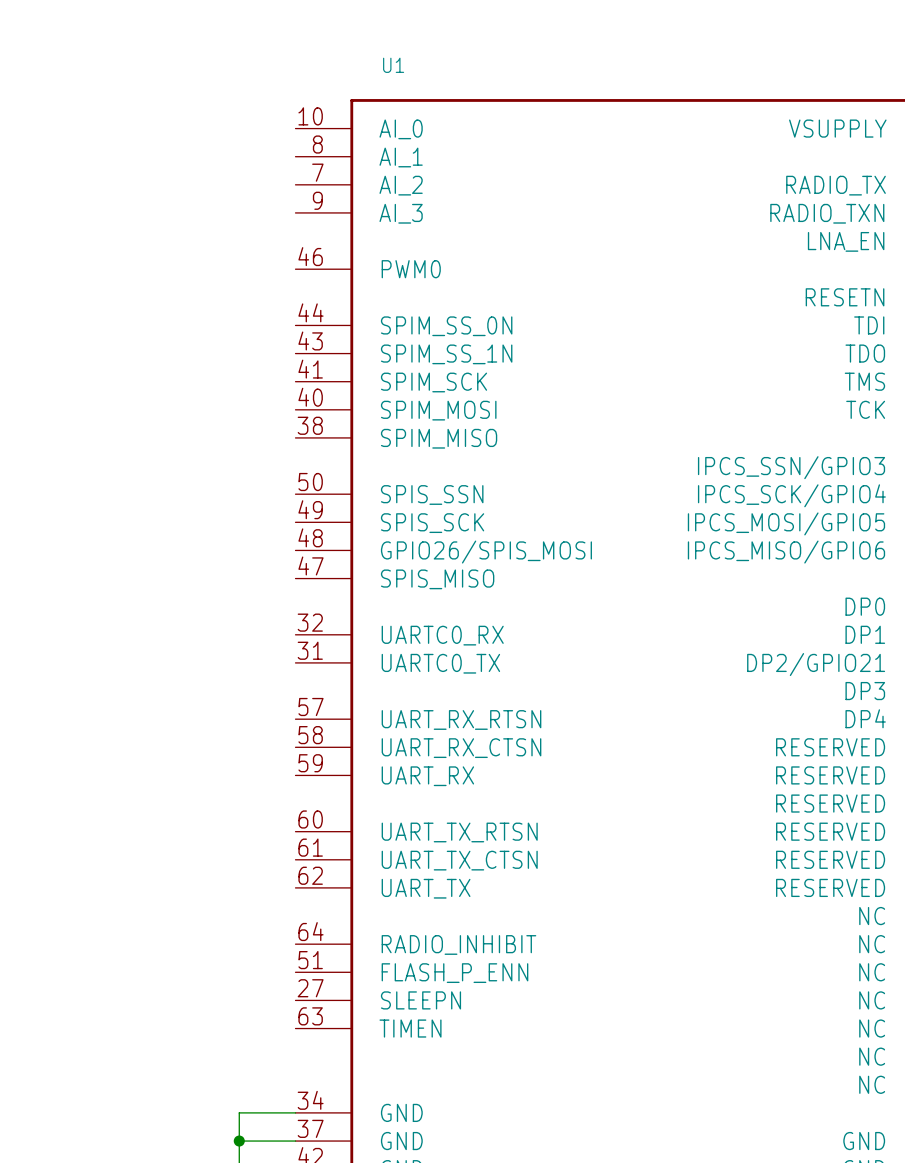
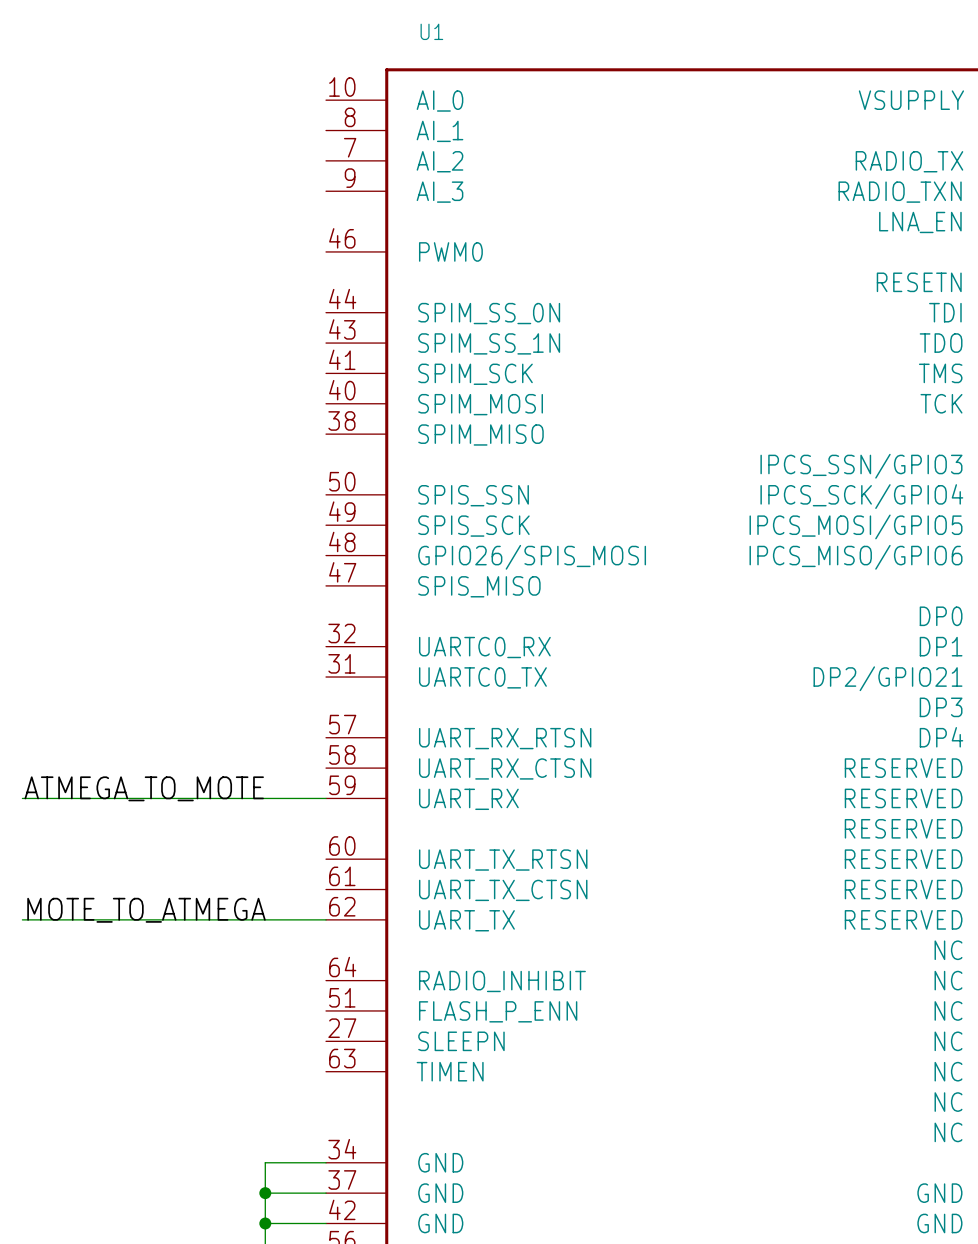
label: none -> ATMEGA_TO_MOTE (144, 788)
wire: none -> (22, 798) (326, 798)
label: none -> MOTE_TO_ATMEGA (146, 910)
wire: none -> (22, 919) (326, 919)

